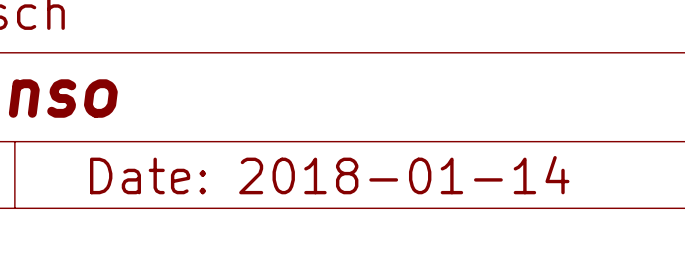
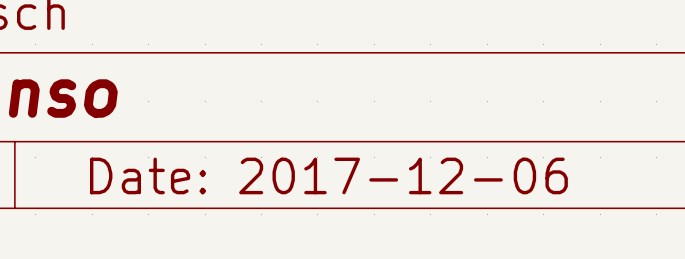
title block: Date: 2018-01-14 (329, 175) -> Date: 2017-12-06 (328, 175)

